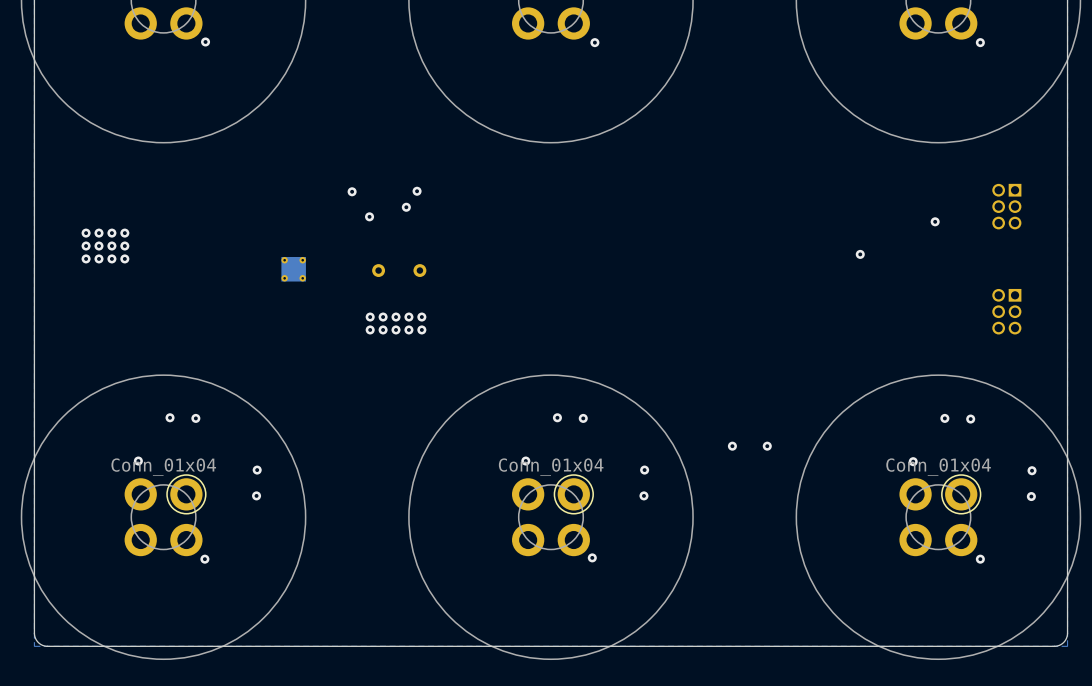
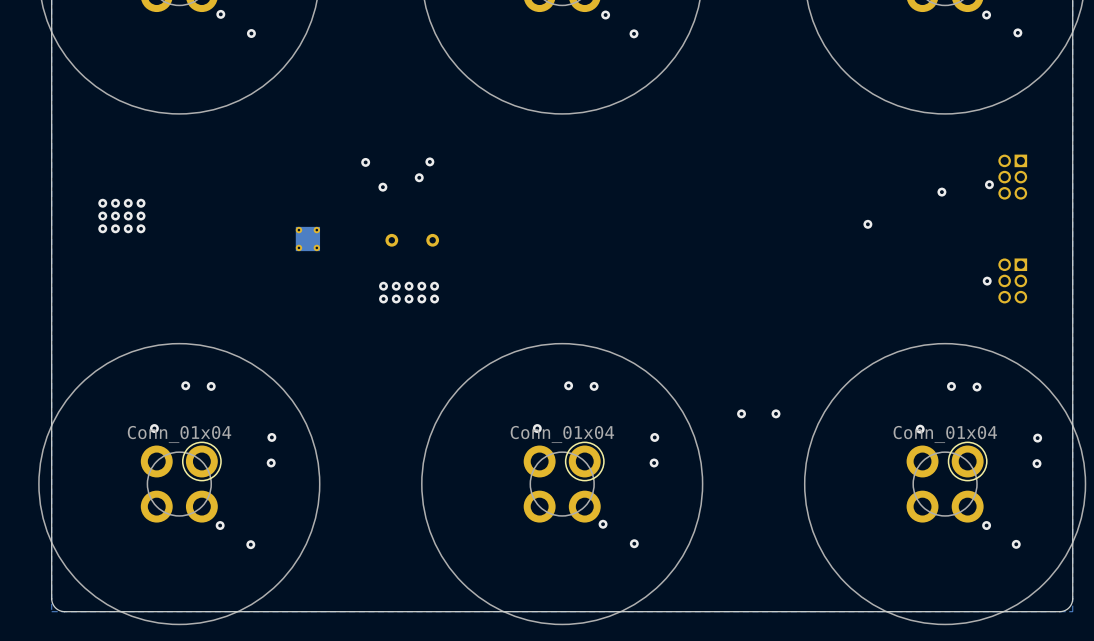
via: none -> (1017, 32)
via: none -> (251, 33)
via: none -> (634, 33)
via: none -> (989, 184)
via: none -> (987, 281)
via: none -> (634, 543)
via: none -> (250, 544)
via: none -> (1016, 544)

